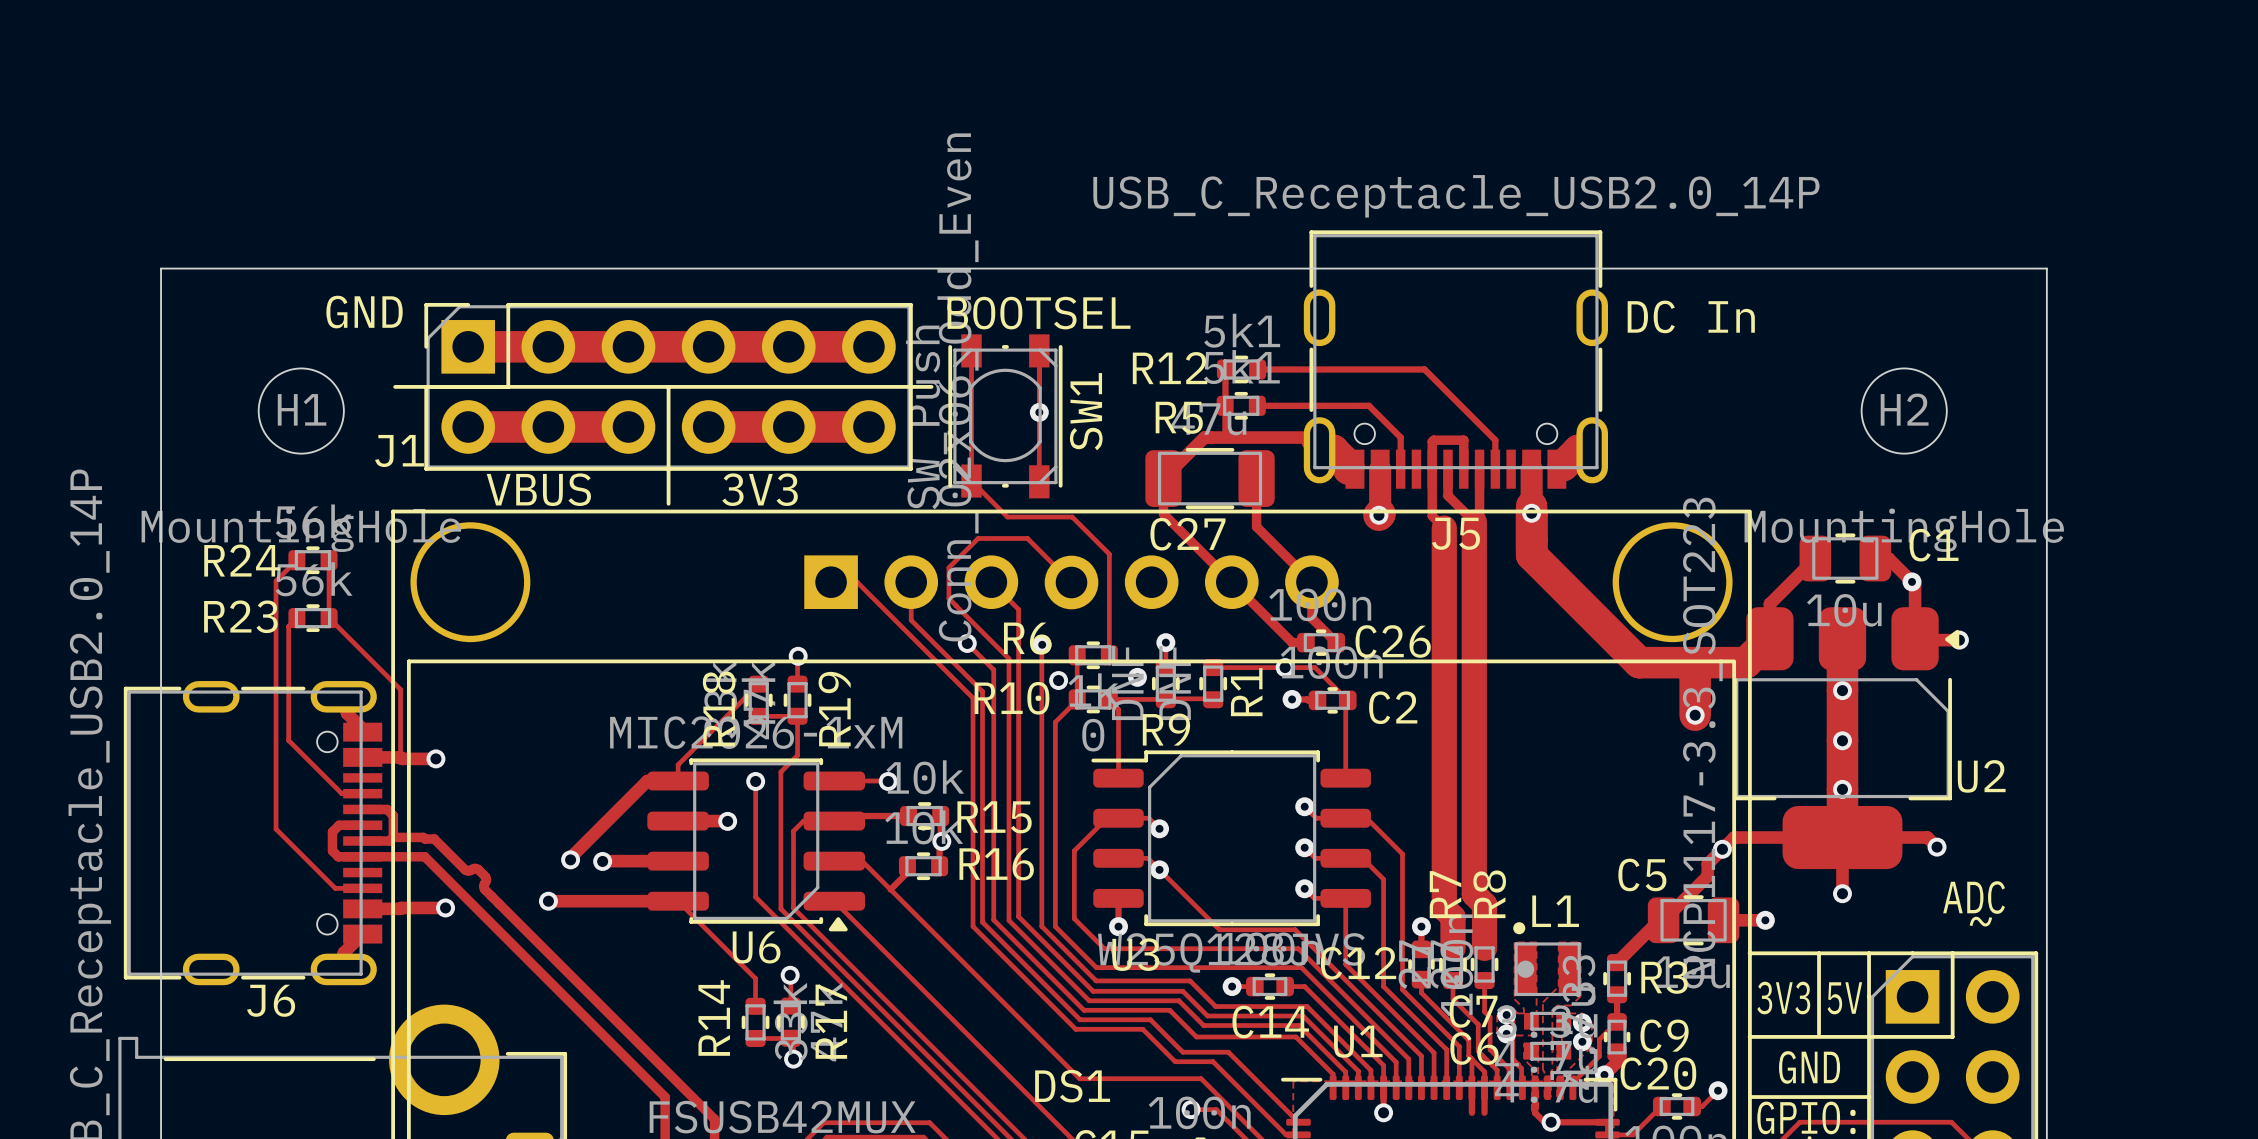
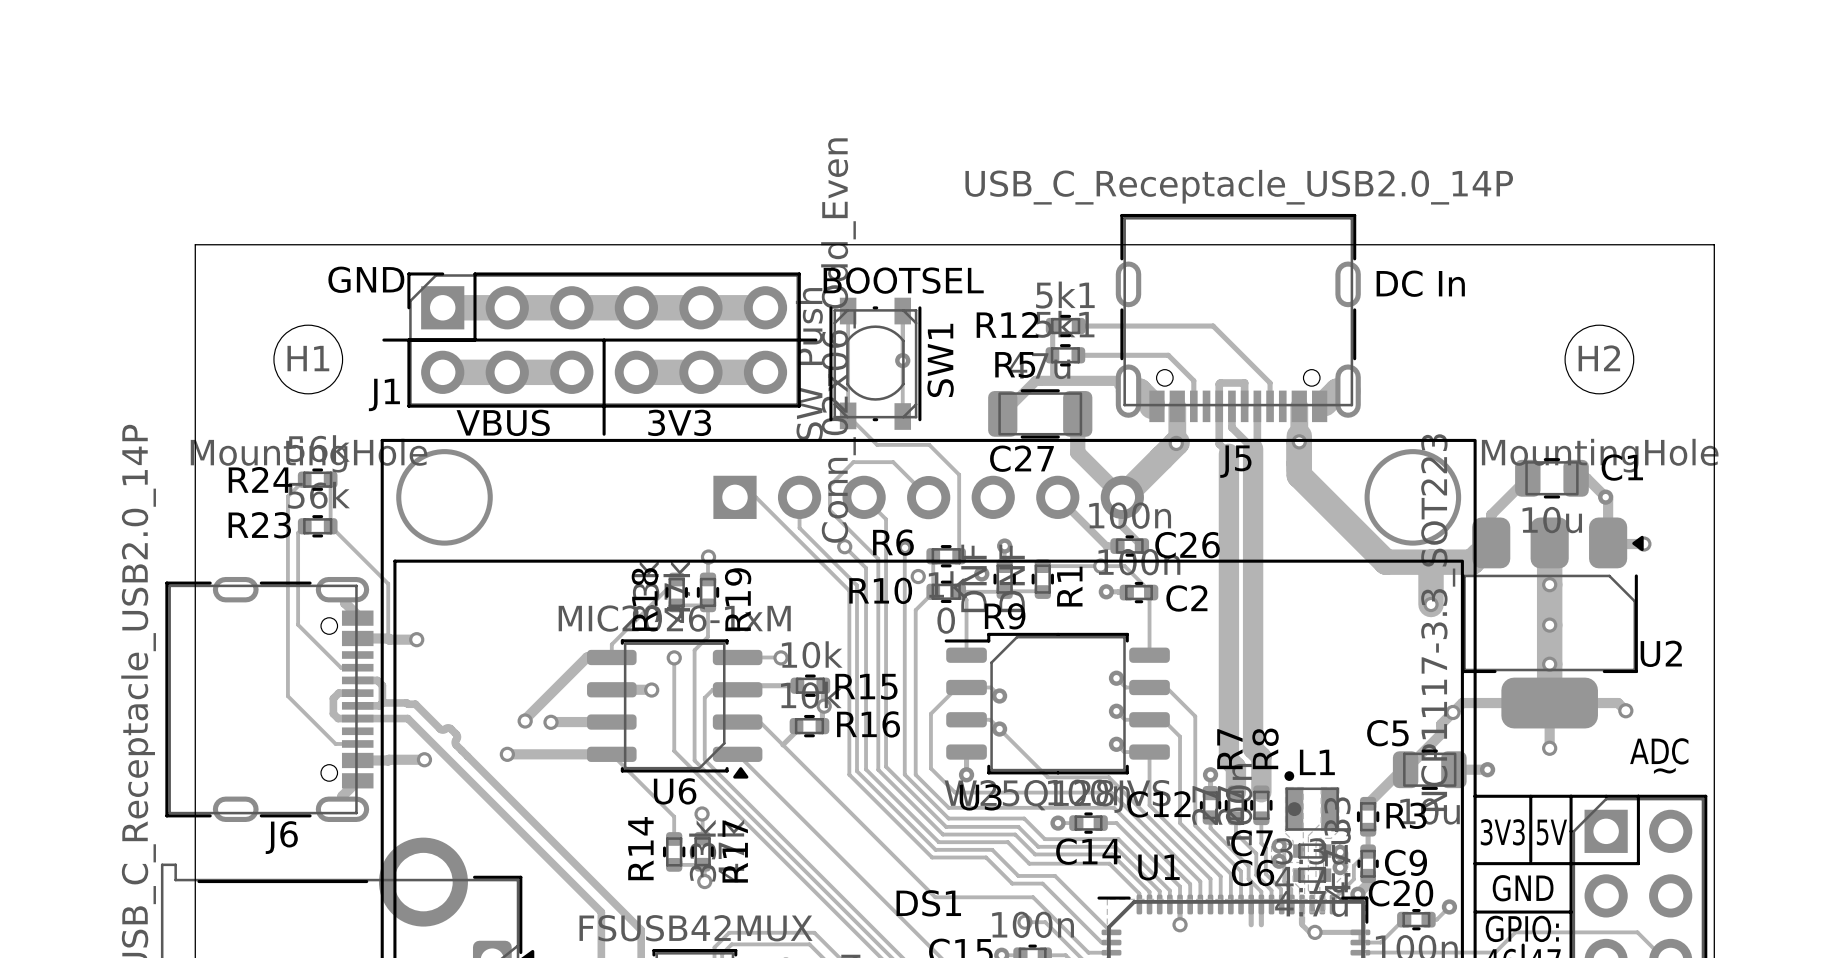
track: (1163, 478) (1163, 513) (1231, 582) -> none
track width: thin (1256, 478) (1256, 526) (1311, 582) -> thick (1077, 413) (1077, 452) (1122, 497)
track: none -> (1176, 443) (1122, 497)

